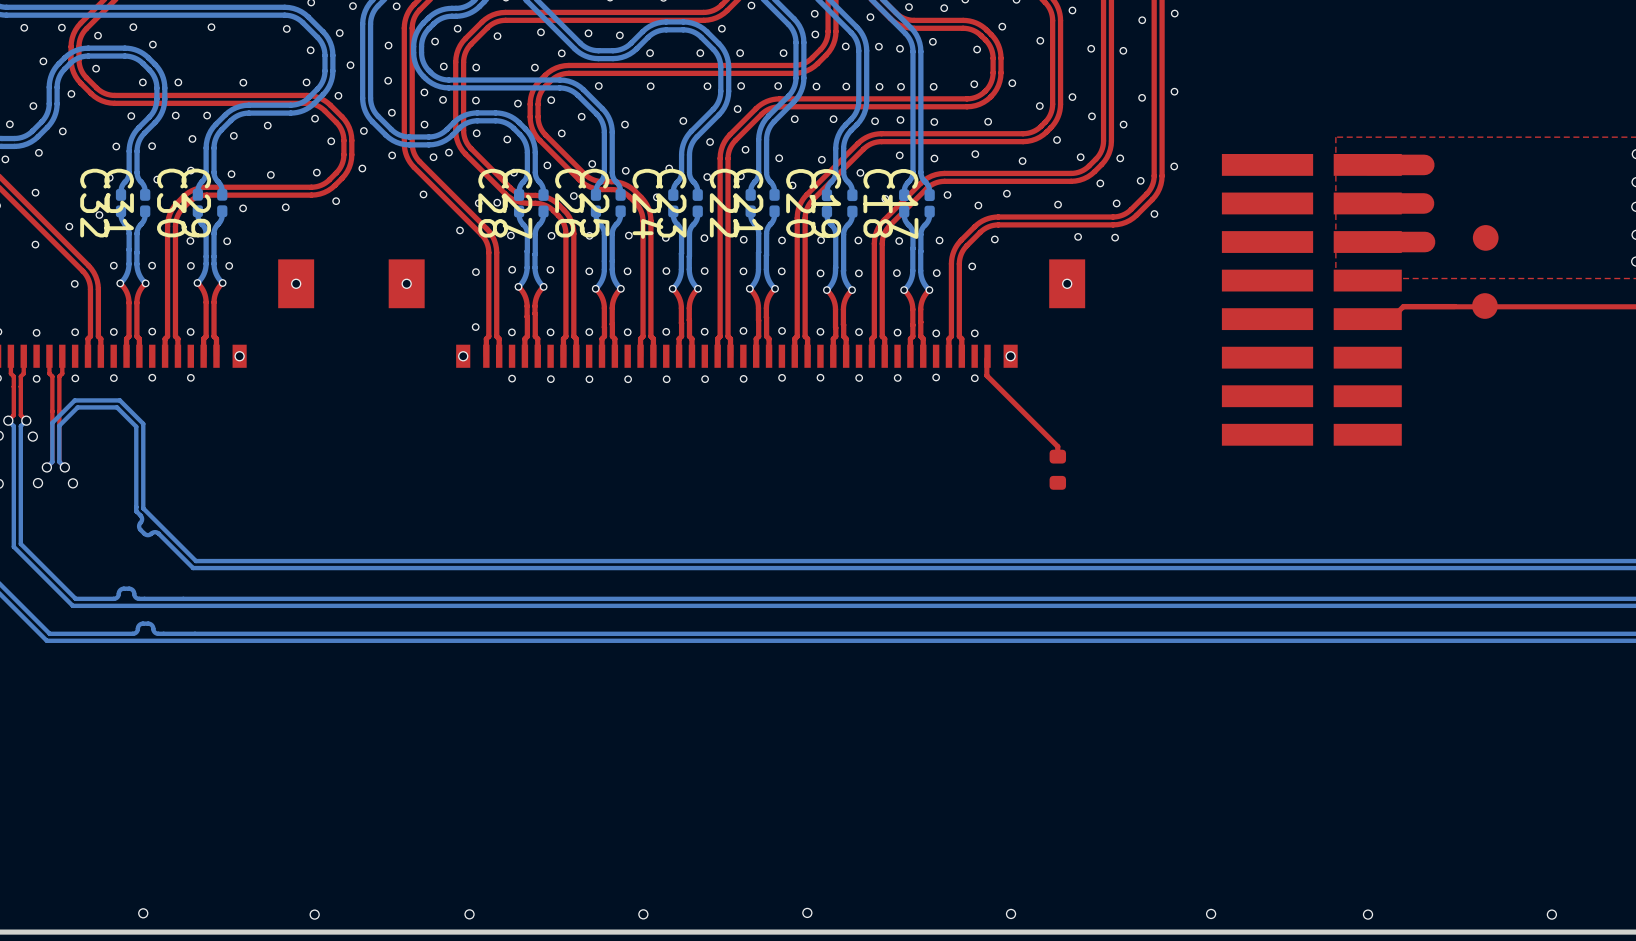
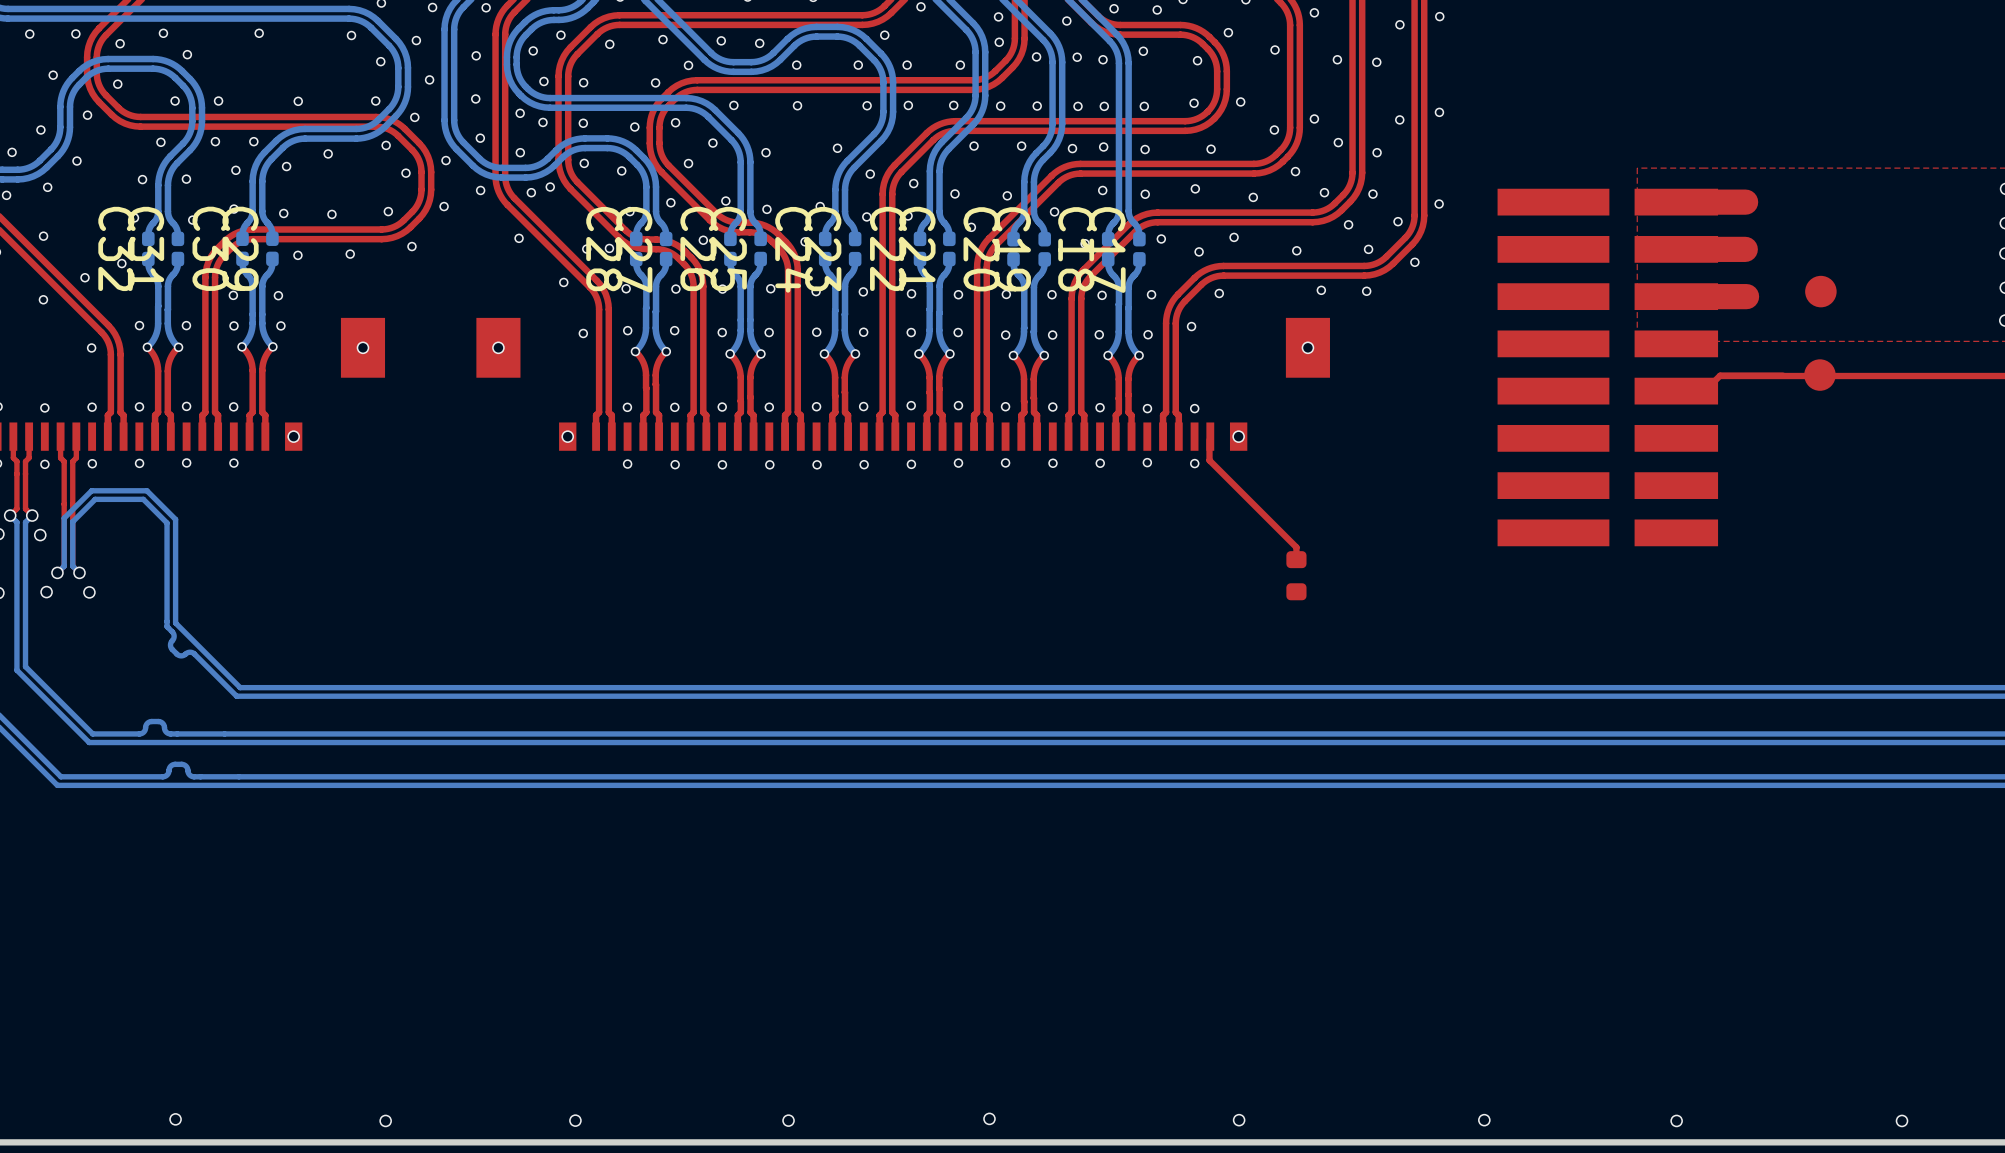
via: (737, 109) -> none
via: (475, 327) -> none

